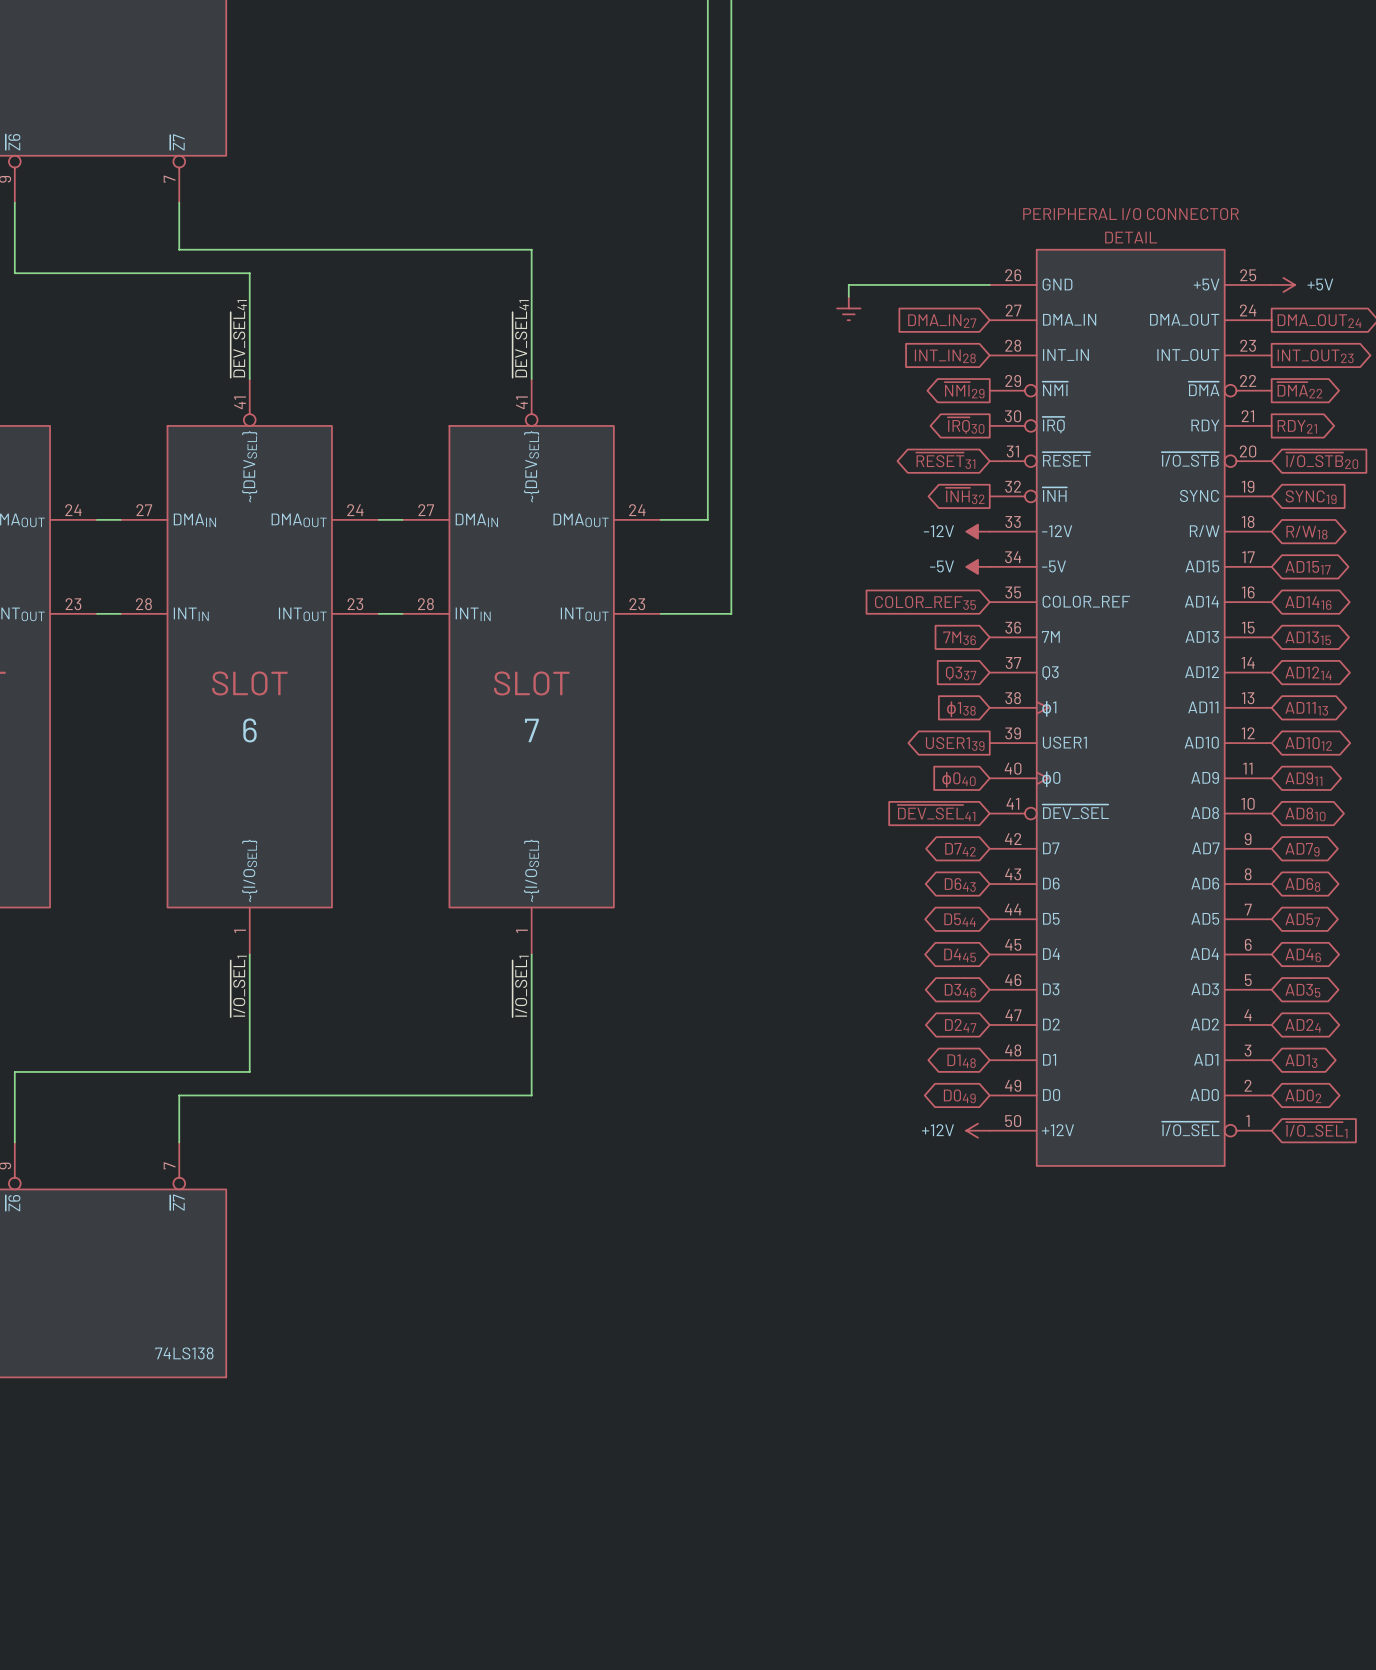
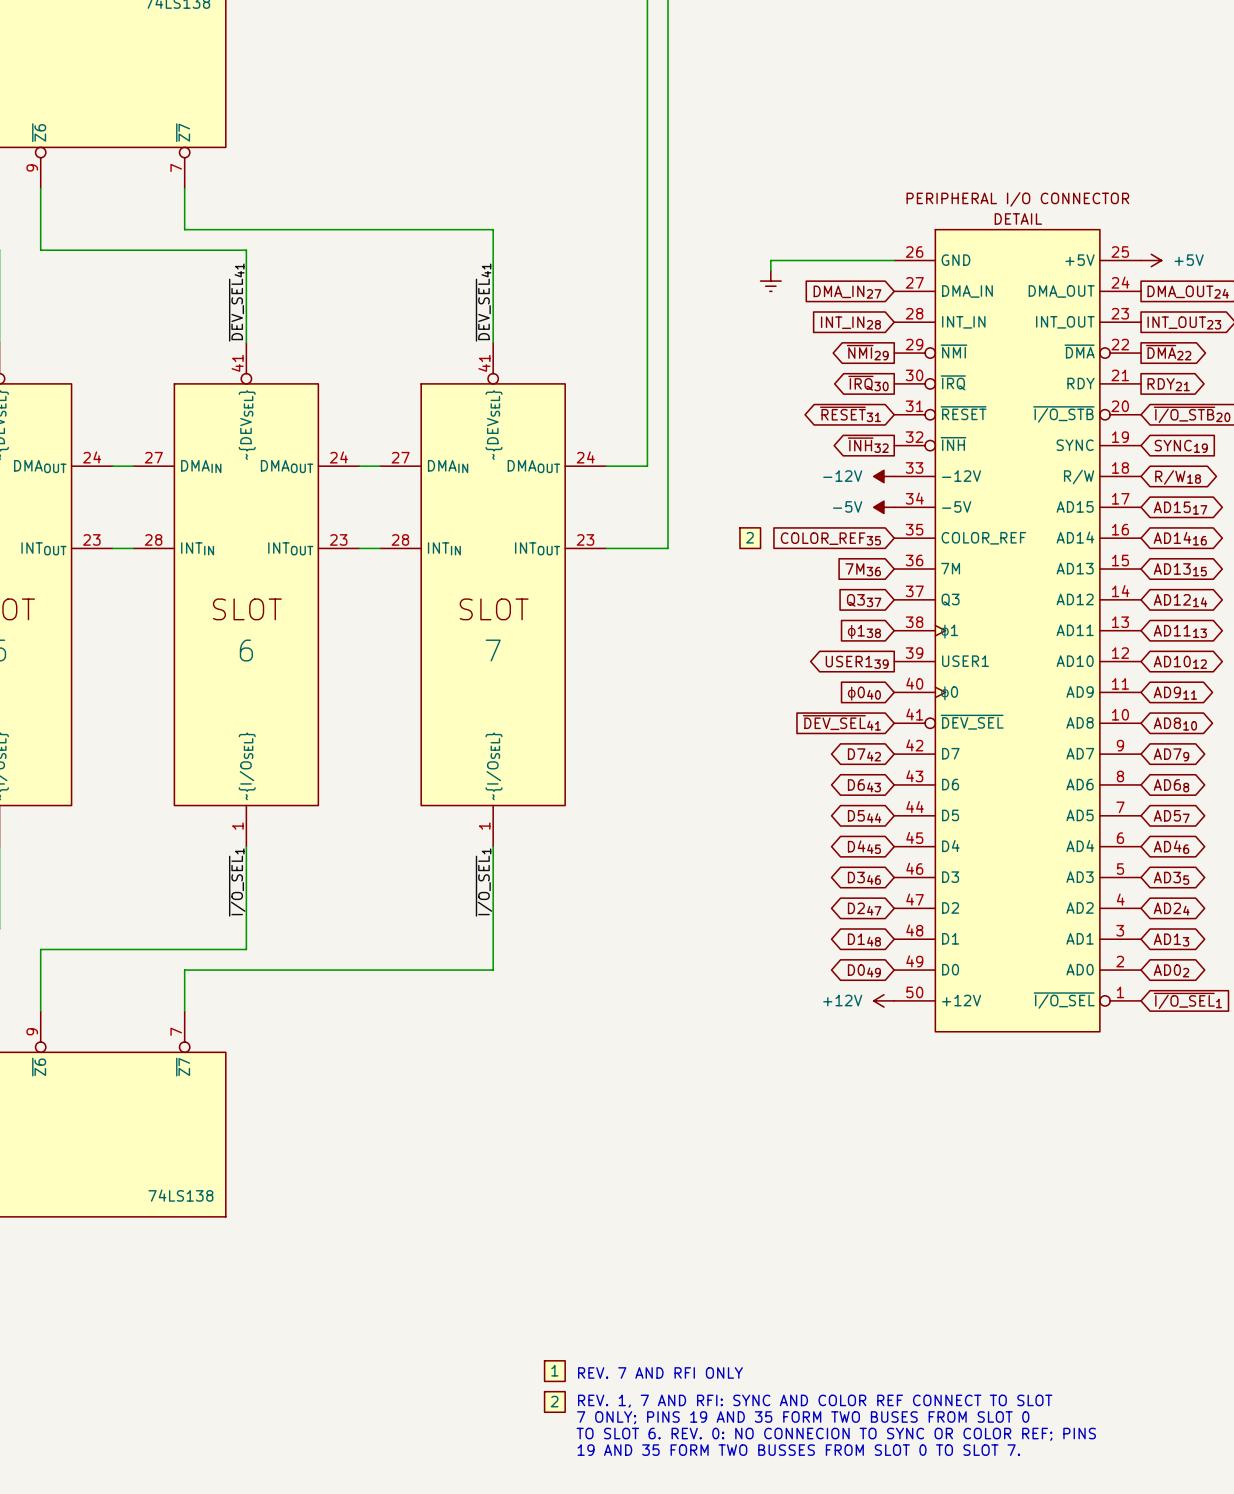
part: none -> 2 (750, 538)
part: none -> 1 (554, 1371)
text: none -> REV. 7 AND RFI ONLY (660, 1372)
text: none -> REV. 1, 7 AND RFI: SYNC AND COLOR REF CONNECT TO SLOT (815, 1401)
part: none -> 2 (554, 1401)
text: none -> 7 ONLY; PINS 19 AND 35 FORM TWO BUSES FROM SLOT 0 (803, 1417)
text: none -> TO SLOT 6. REV. 0: NO CONNECION TO SYNC OR COLOR REF; PINS (836, 1434)
text: none -> 19 AND 35 FORM TWO BUSSES FROM SLOT 0 TO SLOT 7. (798, 1450)

